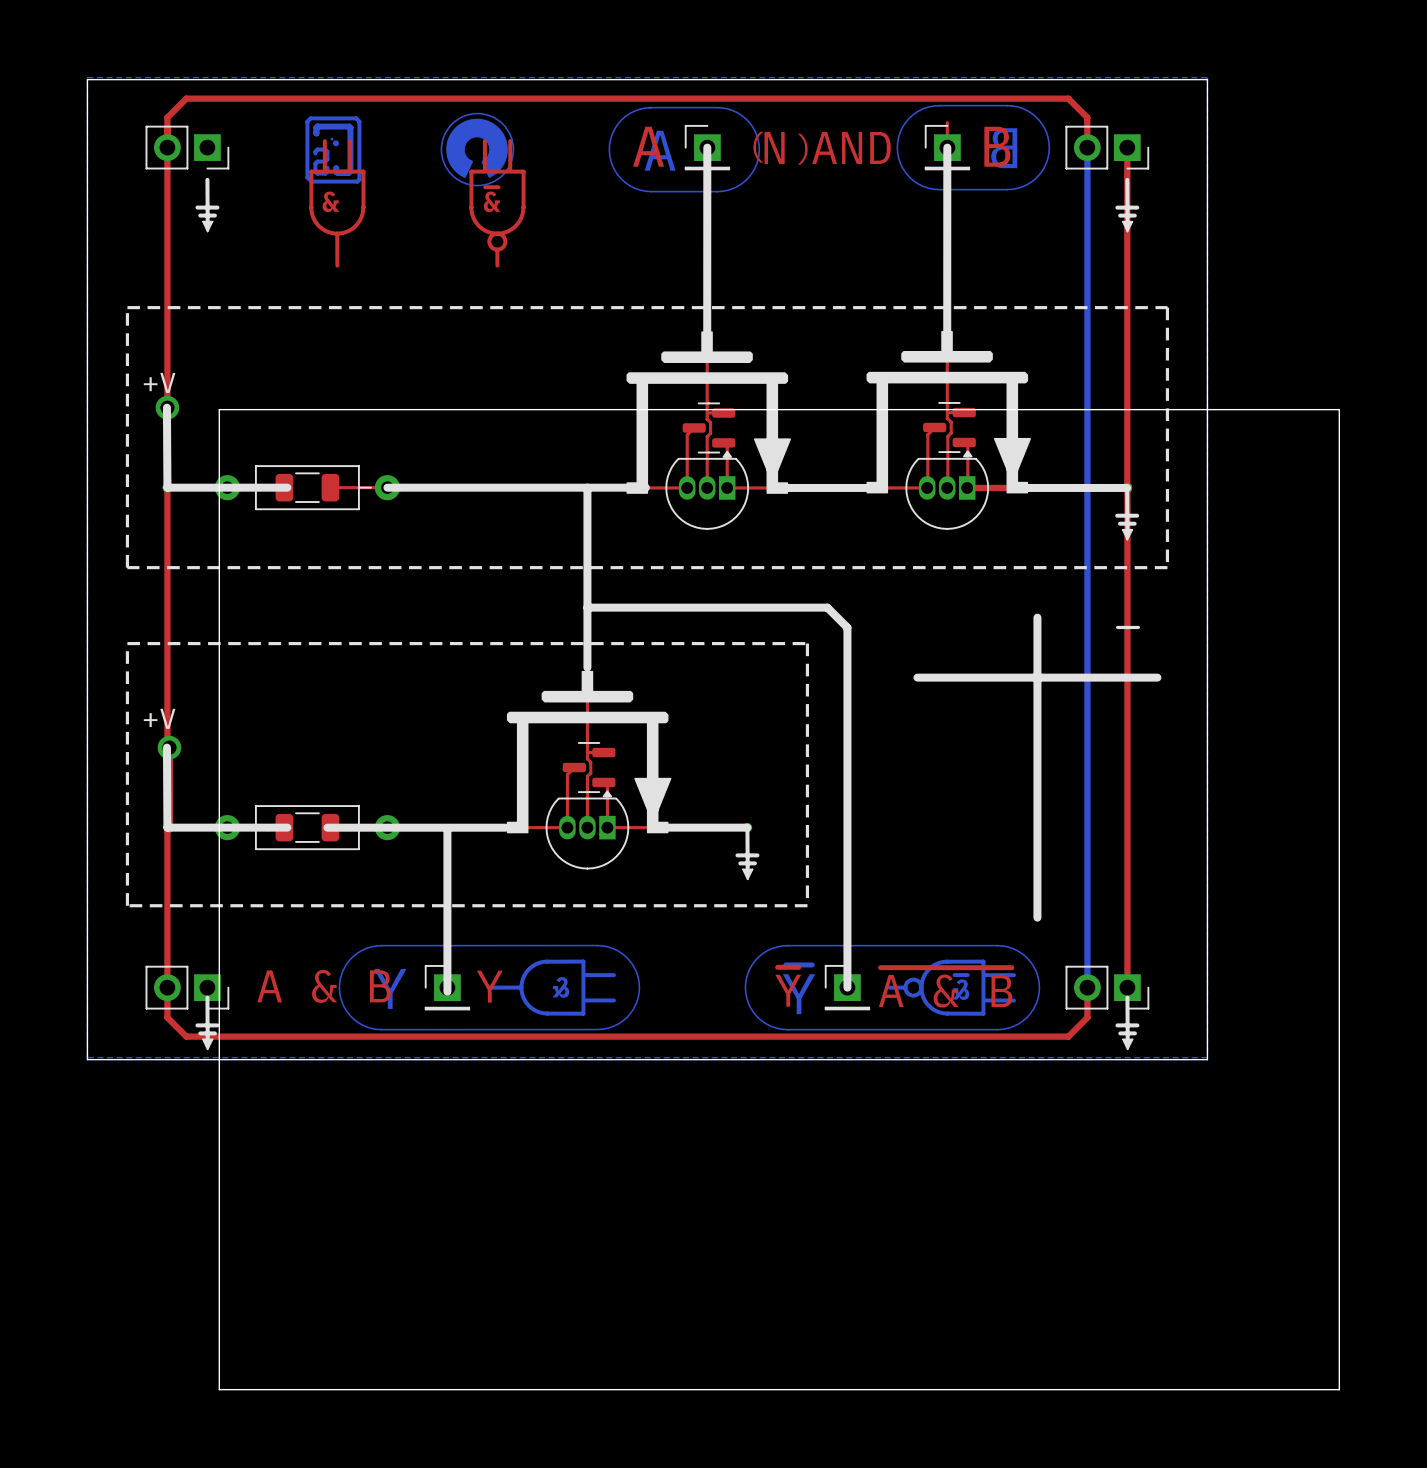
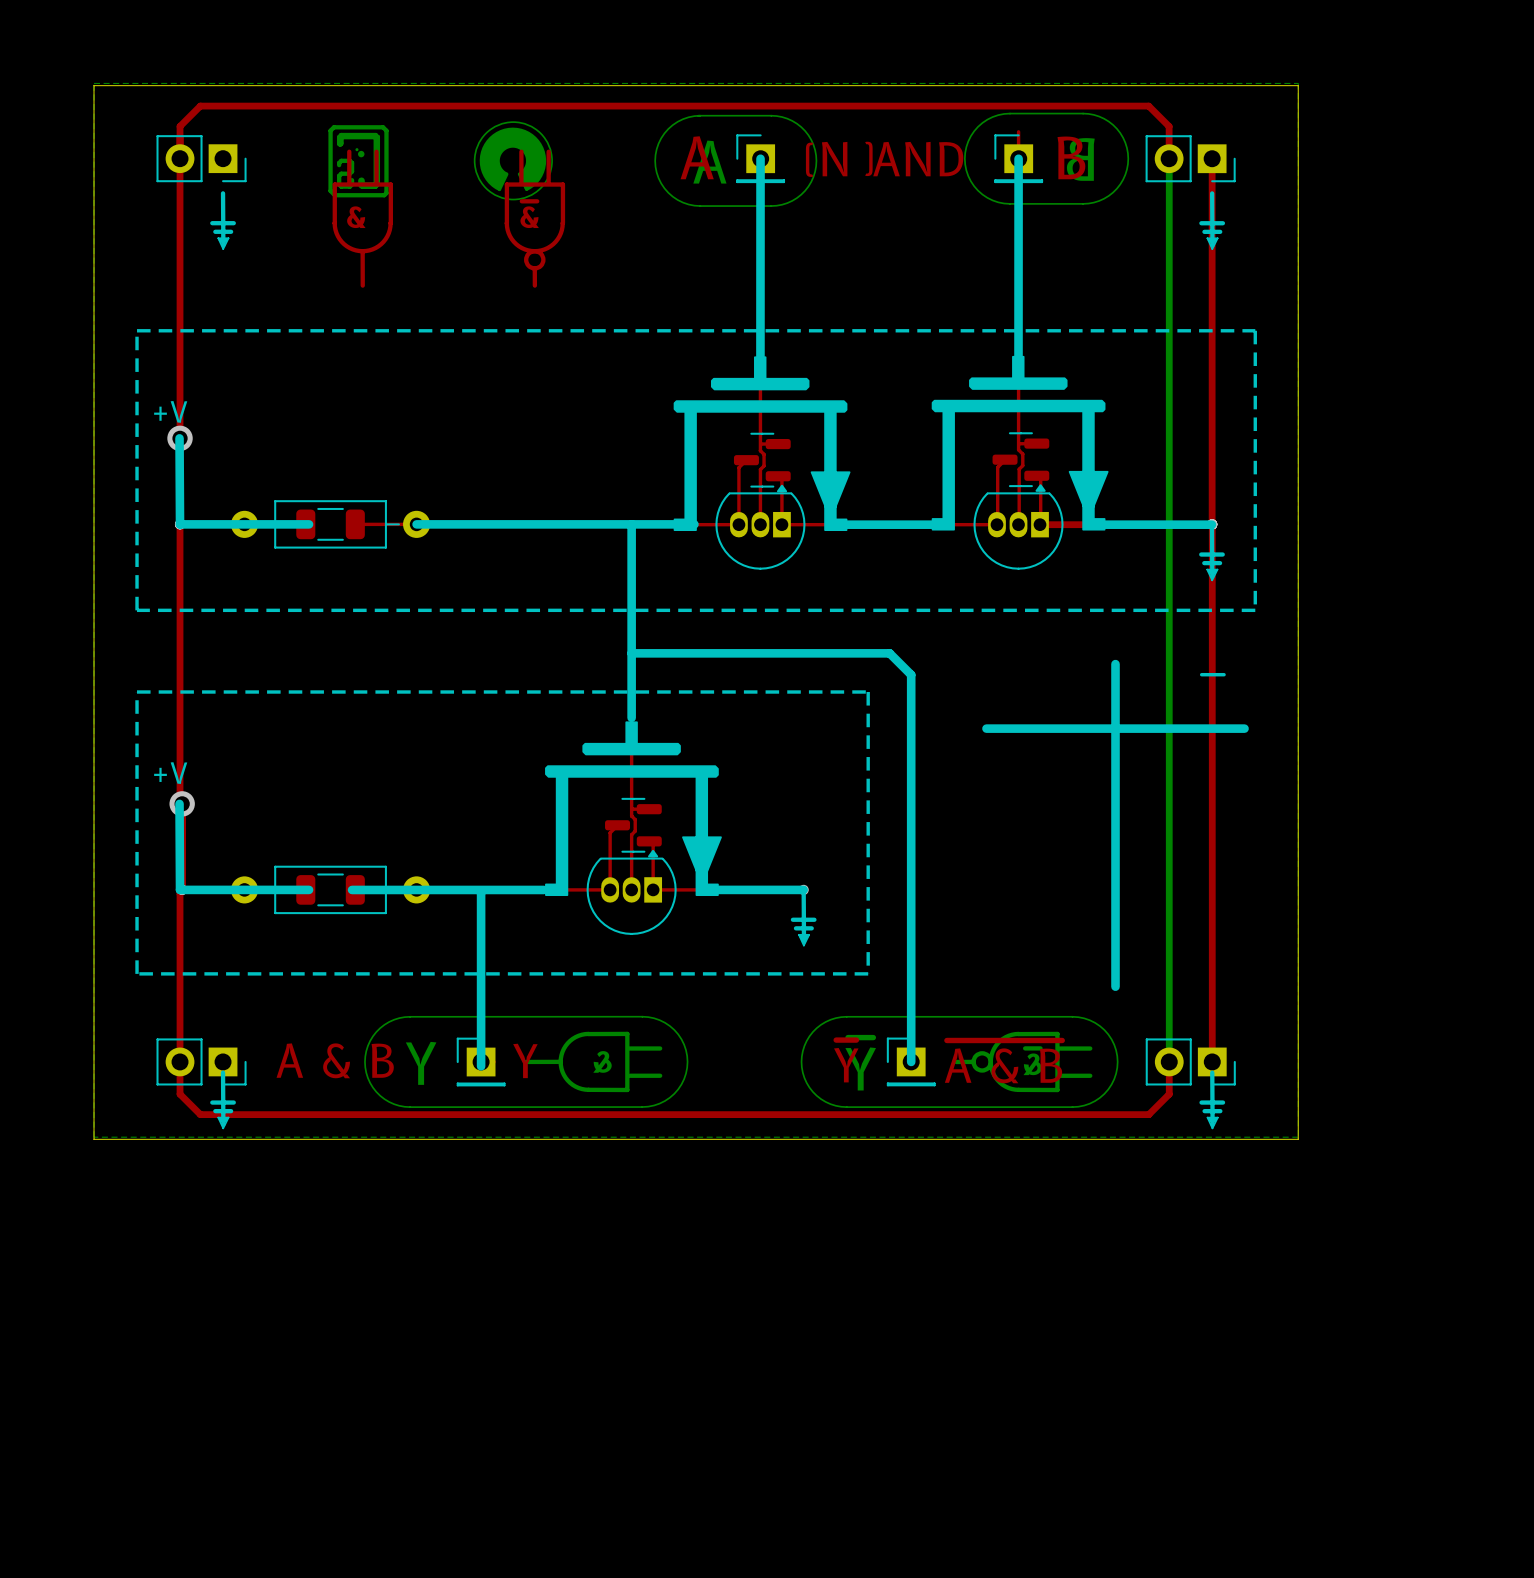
board edge: (219, 409) (1339, 409) (1339, 1389) (219, 1389) (219, 409) -> none

